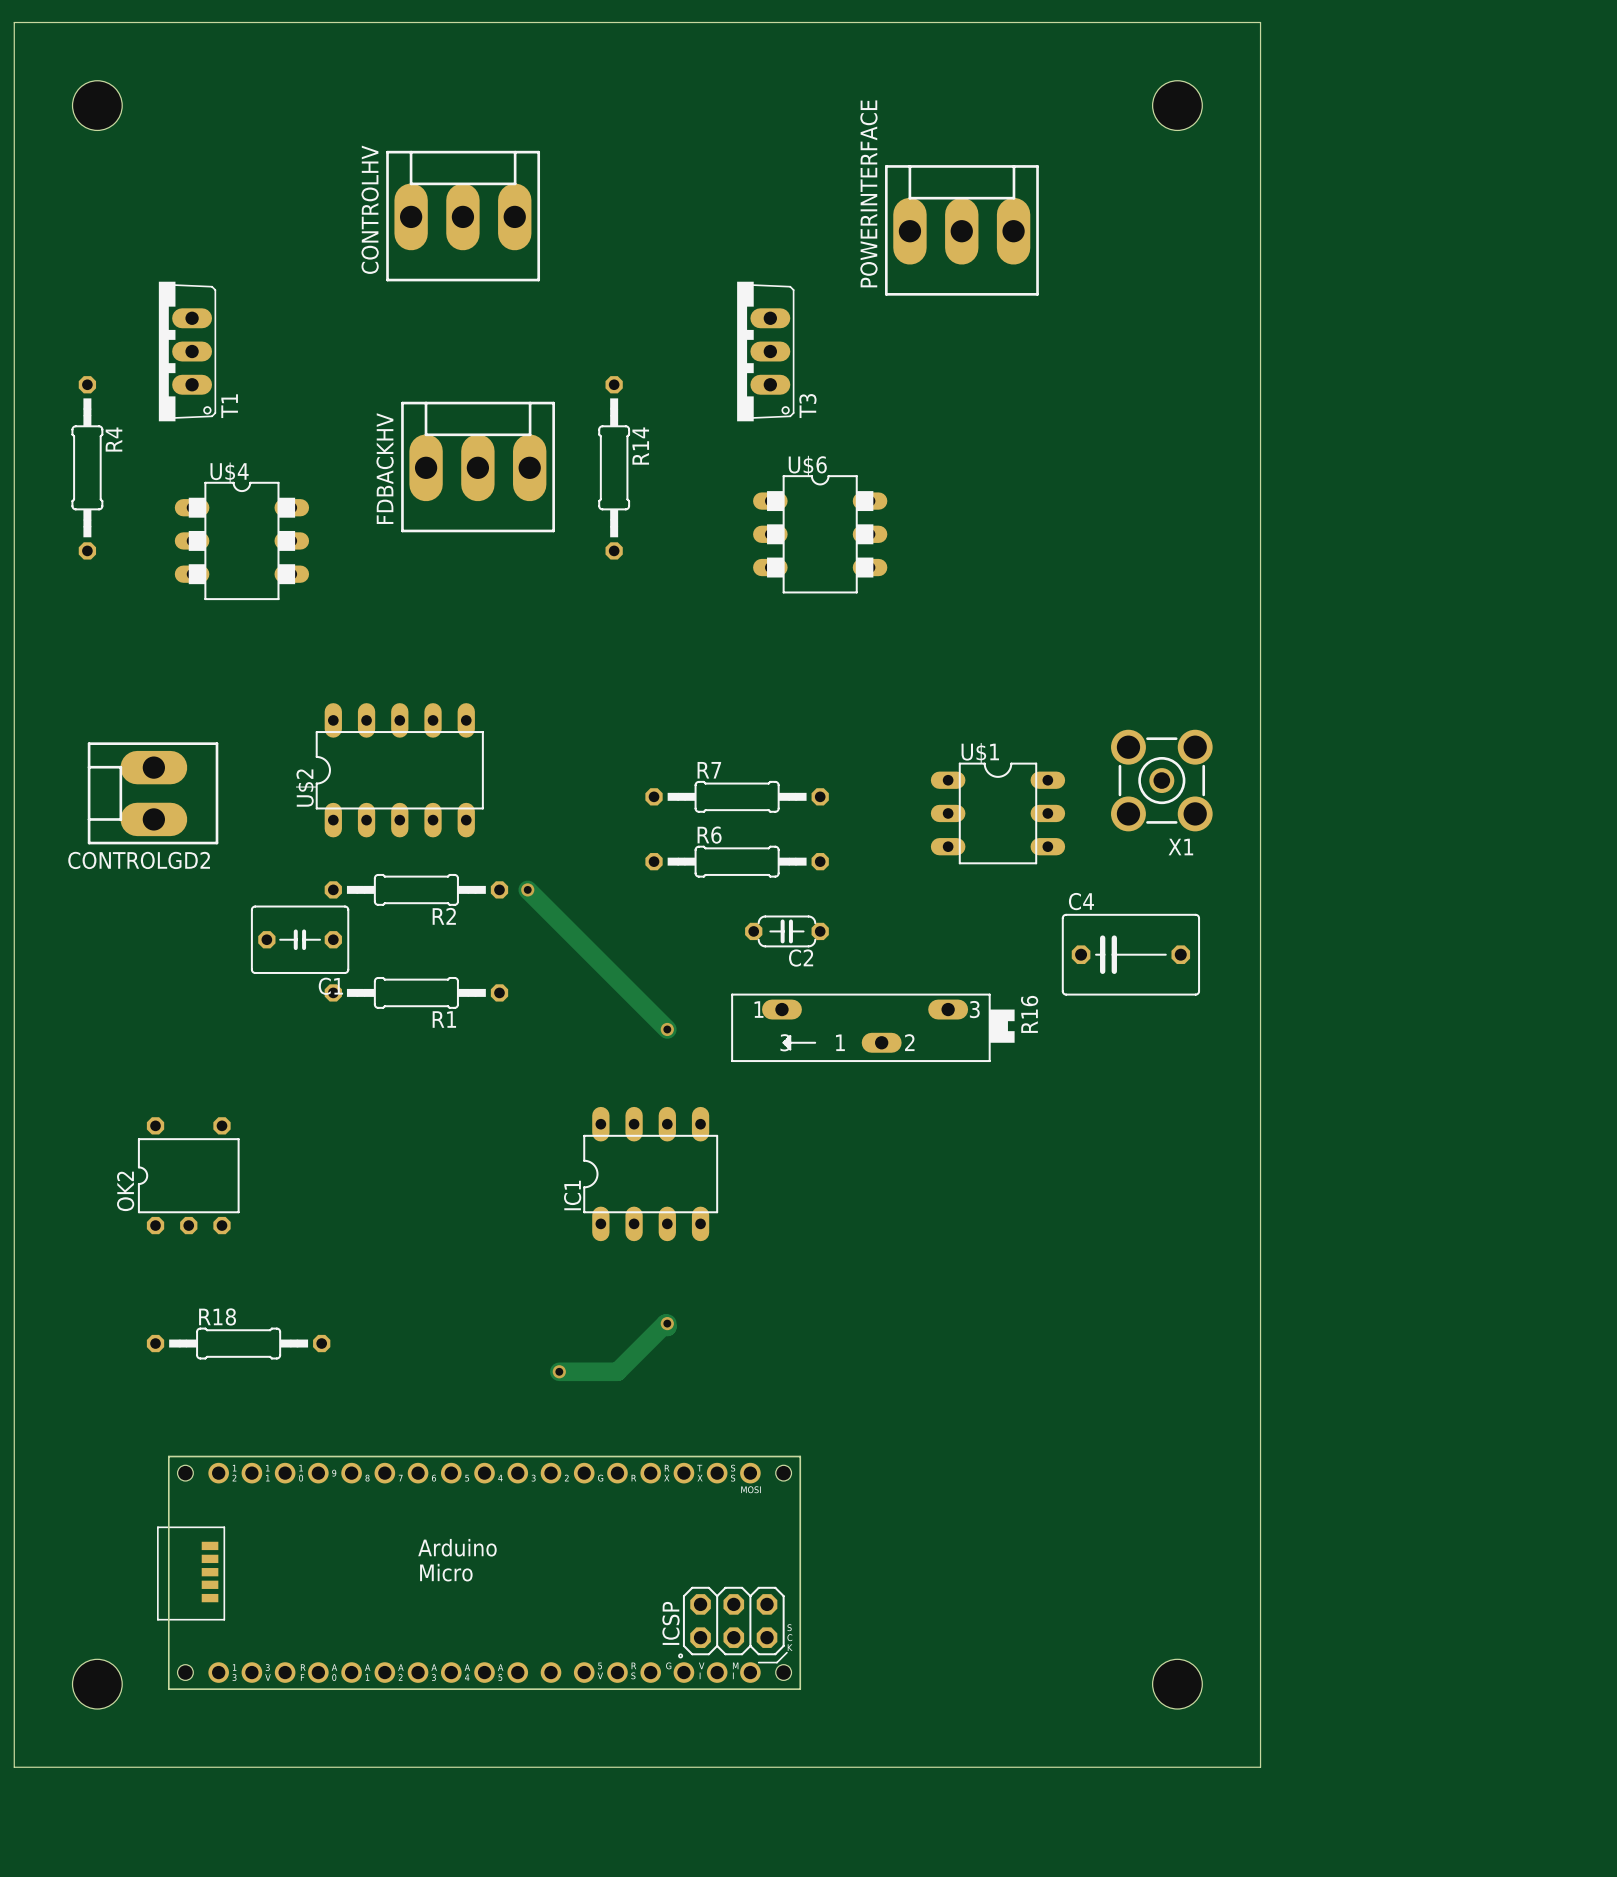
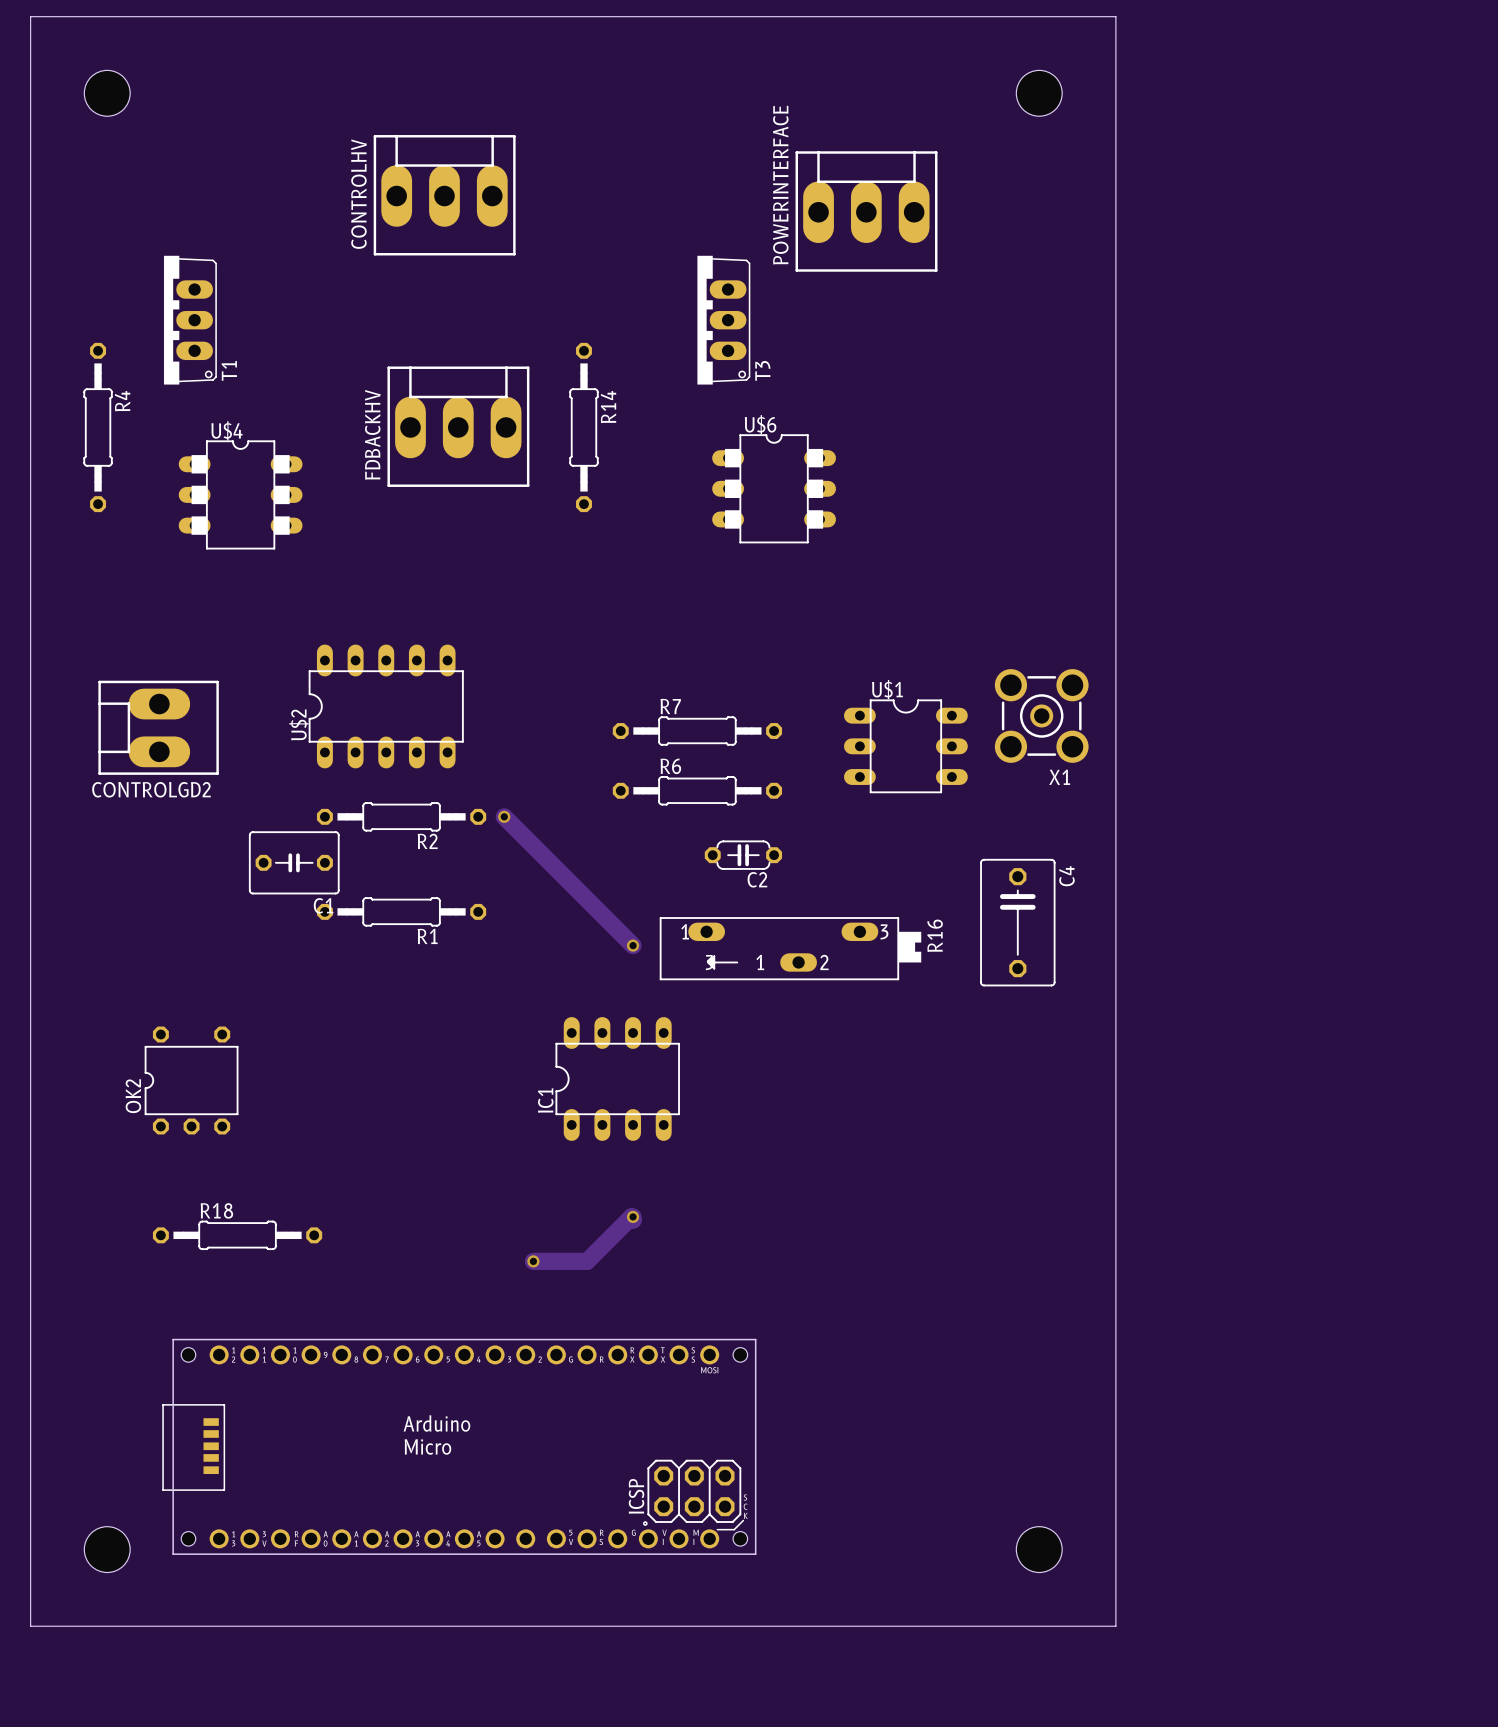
board edge: (1190, 22) (1260, 22) (1260, 1767) (1190, 1767) -> (1115, 16) (1115, 1626)
hole position: (1177, 105) -> (1039, 93)
POWERINTERFACE position: (961, 230) -> (866, 211)
X1 position: (1161, 780) -> (1041, 715)
U$1 position: (997, 813) -> (905, 746)
C4 rotation: 0° (1130, 954) -> 90° clockwise (1017, 922)
R16 position: (872, 1027) -> (790, 948)
hole position: (1177, 1684) -> (1039, 1549)

